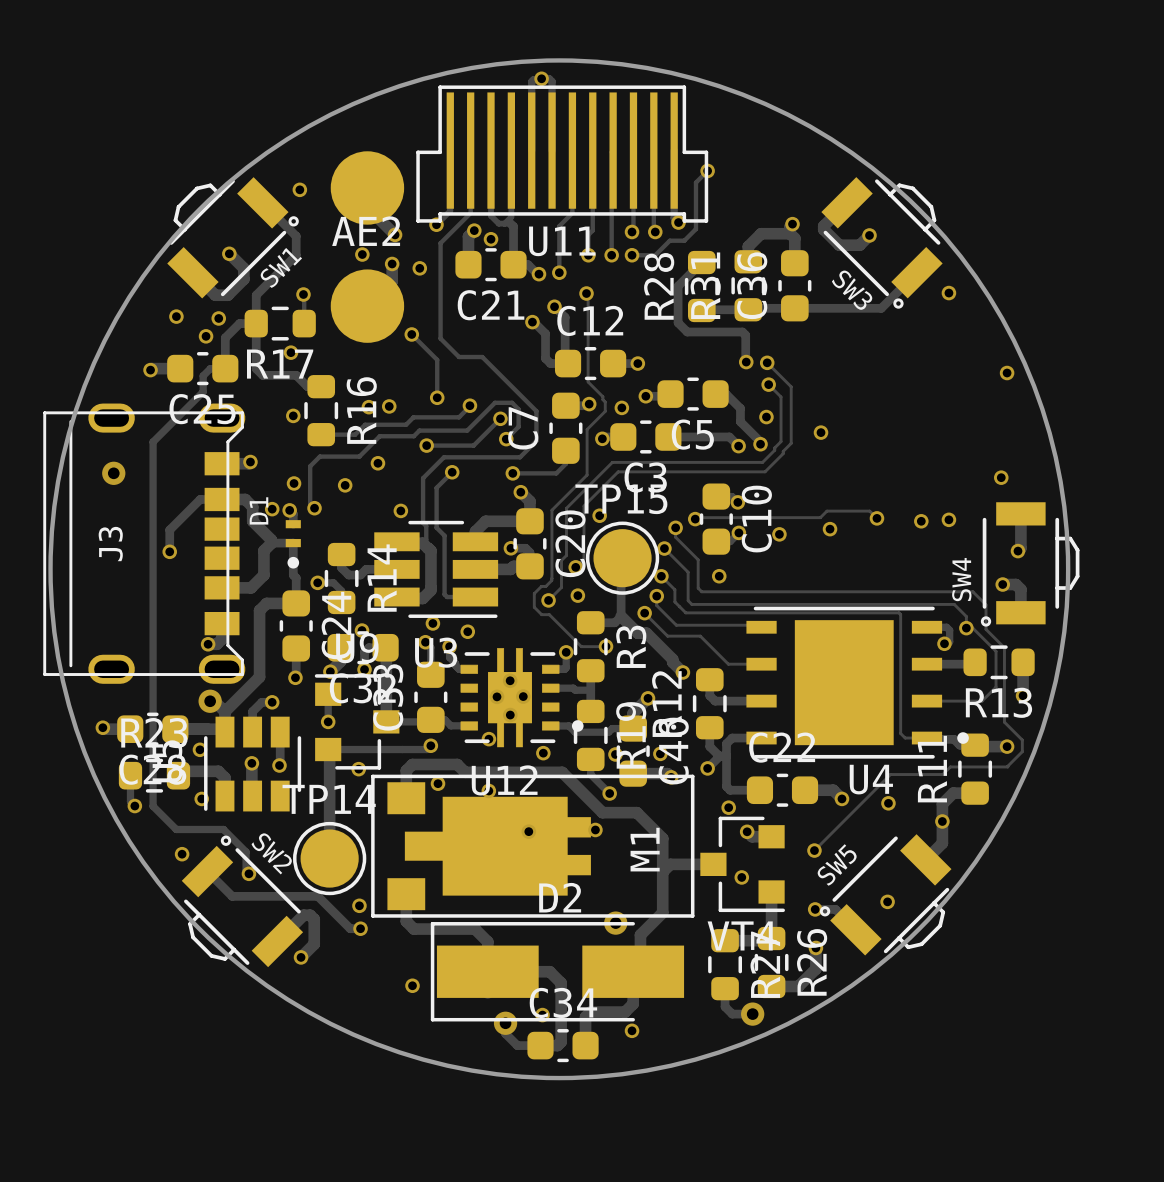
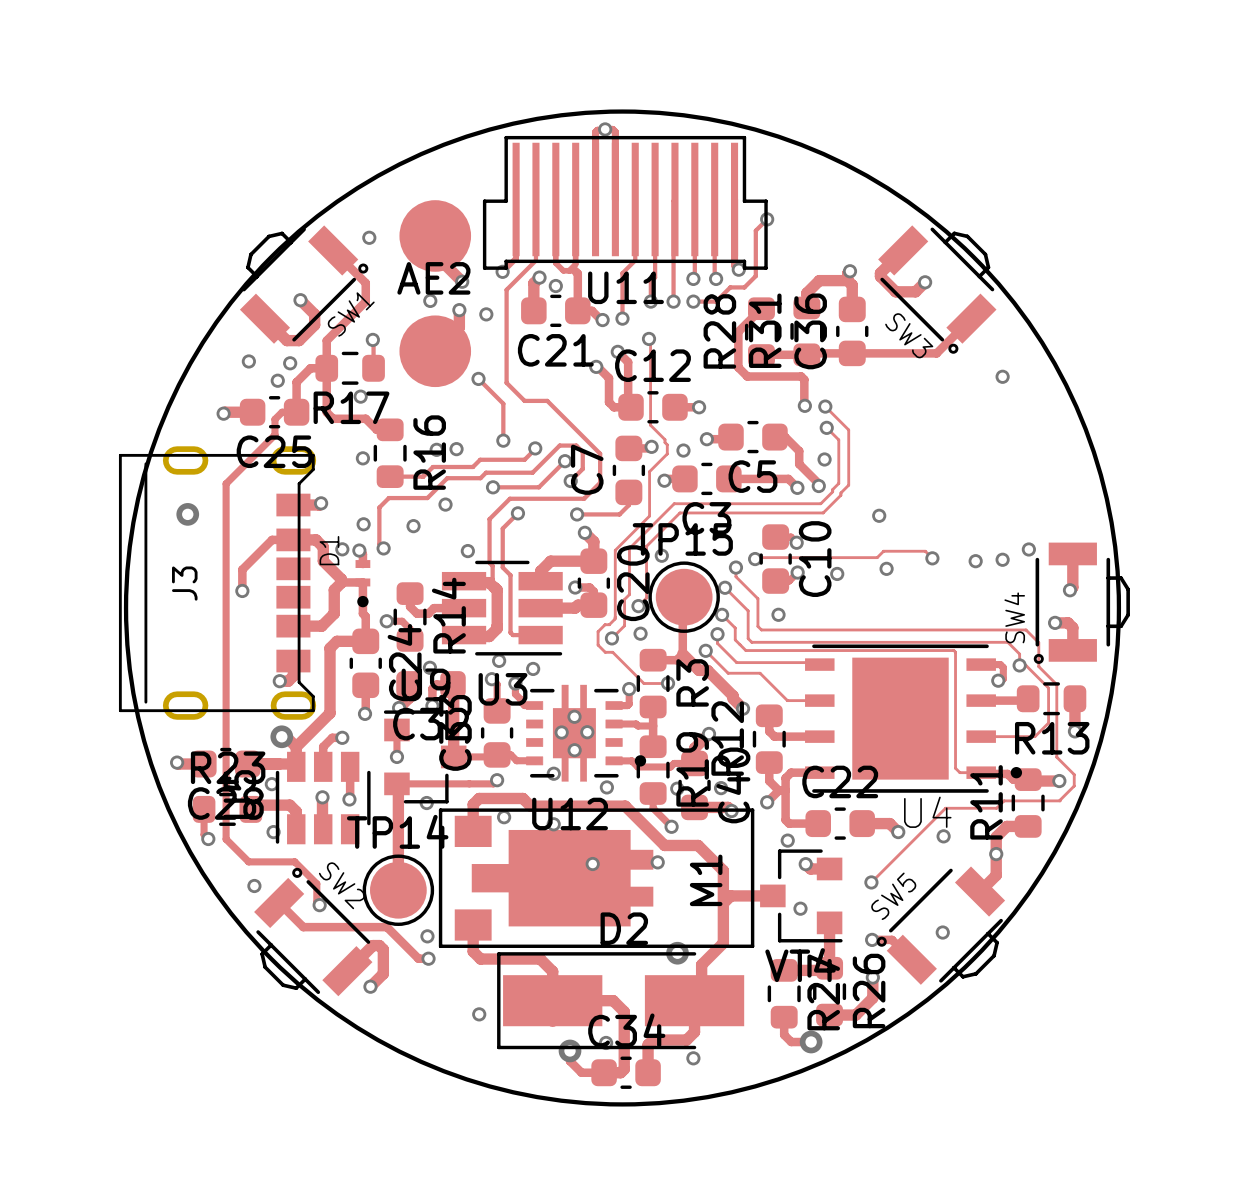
via: (948, 293) -> none
via: none -> (1002, 376)
via: (1007, 373) -> none
via position: (821, 432) -> (879, 515)
via position: (1001, 477) -> (1028, 549)

